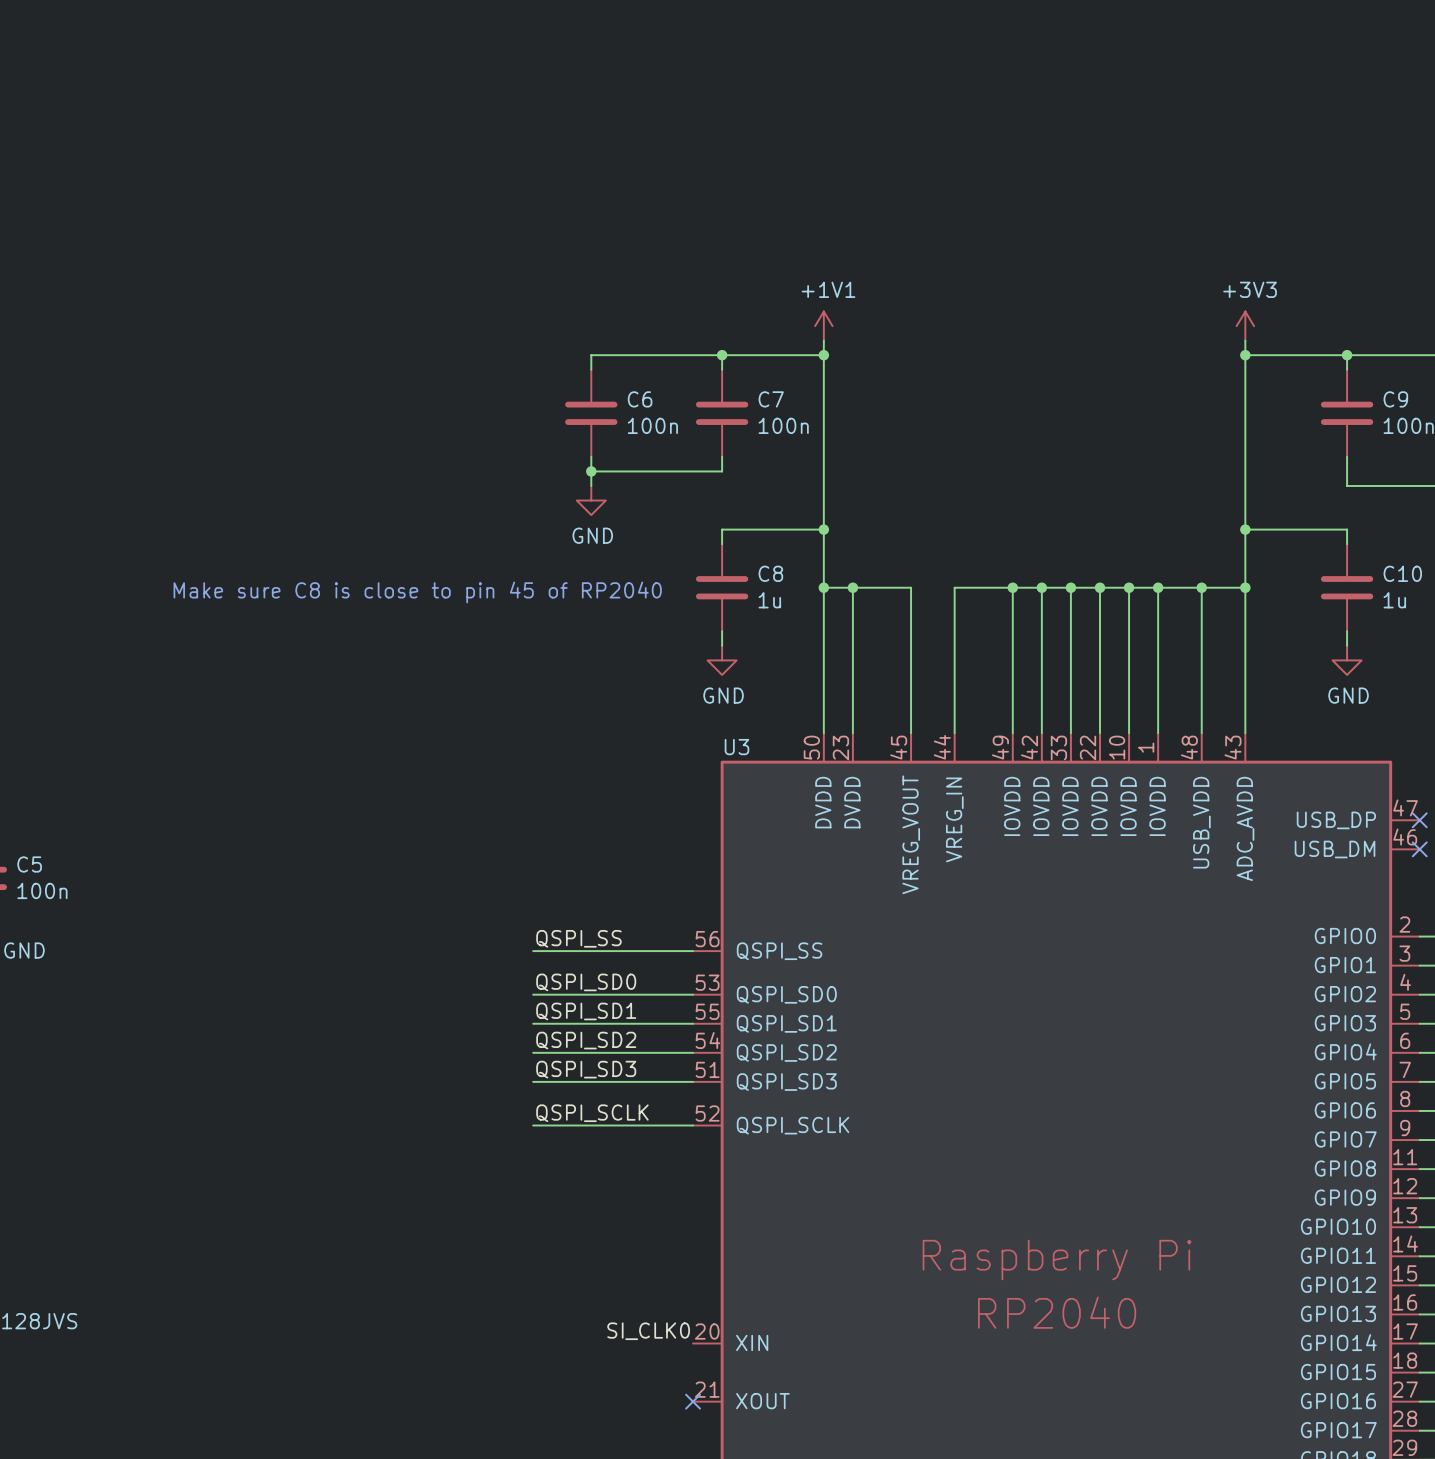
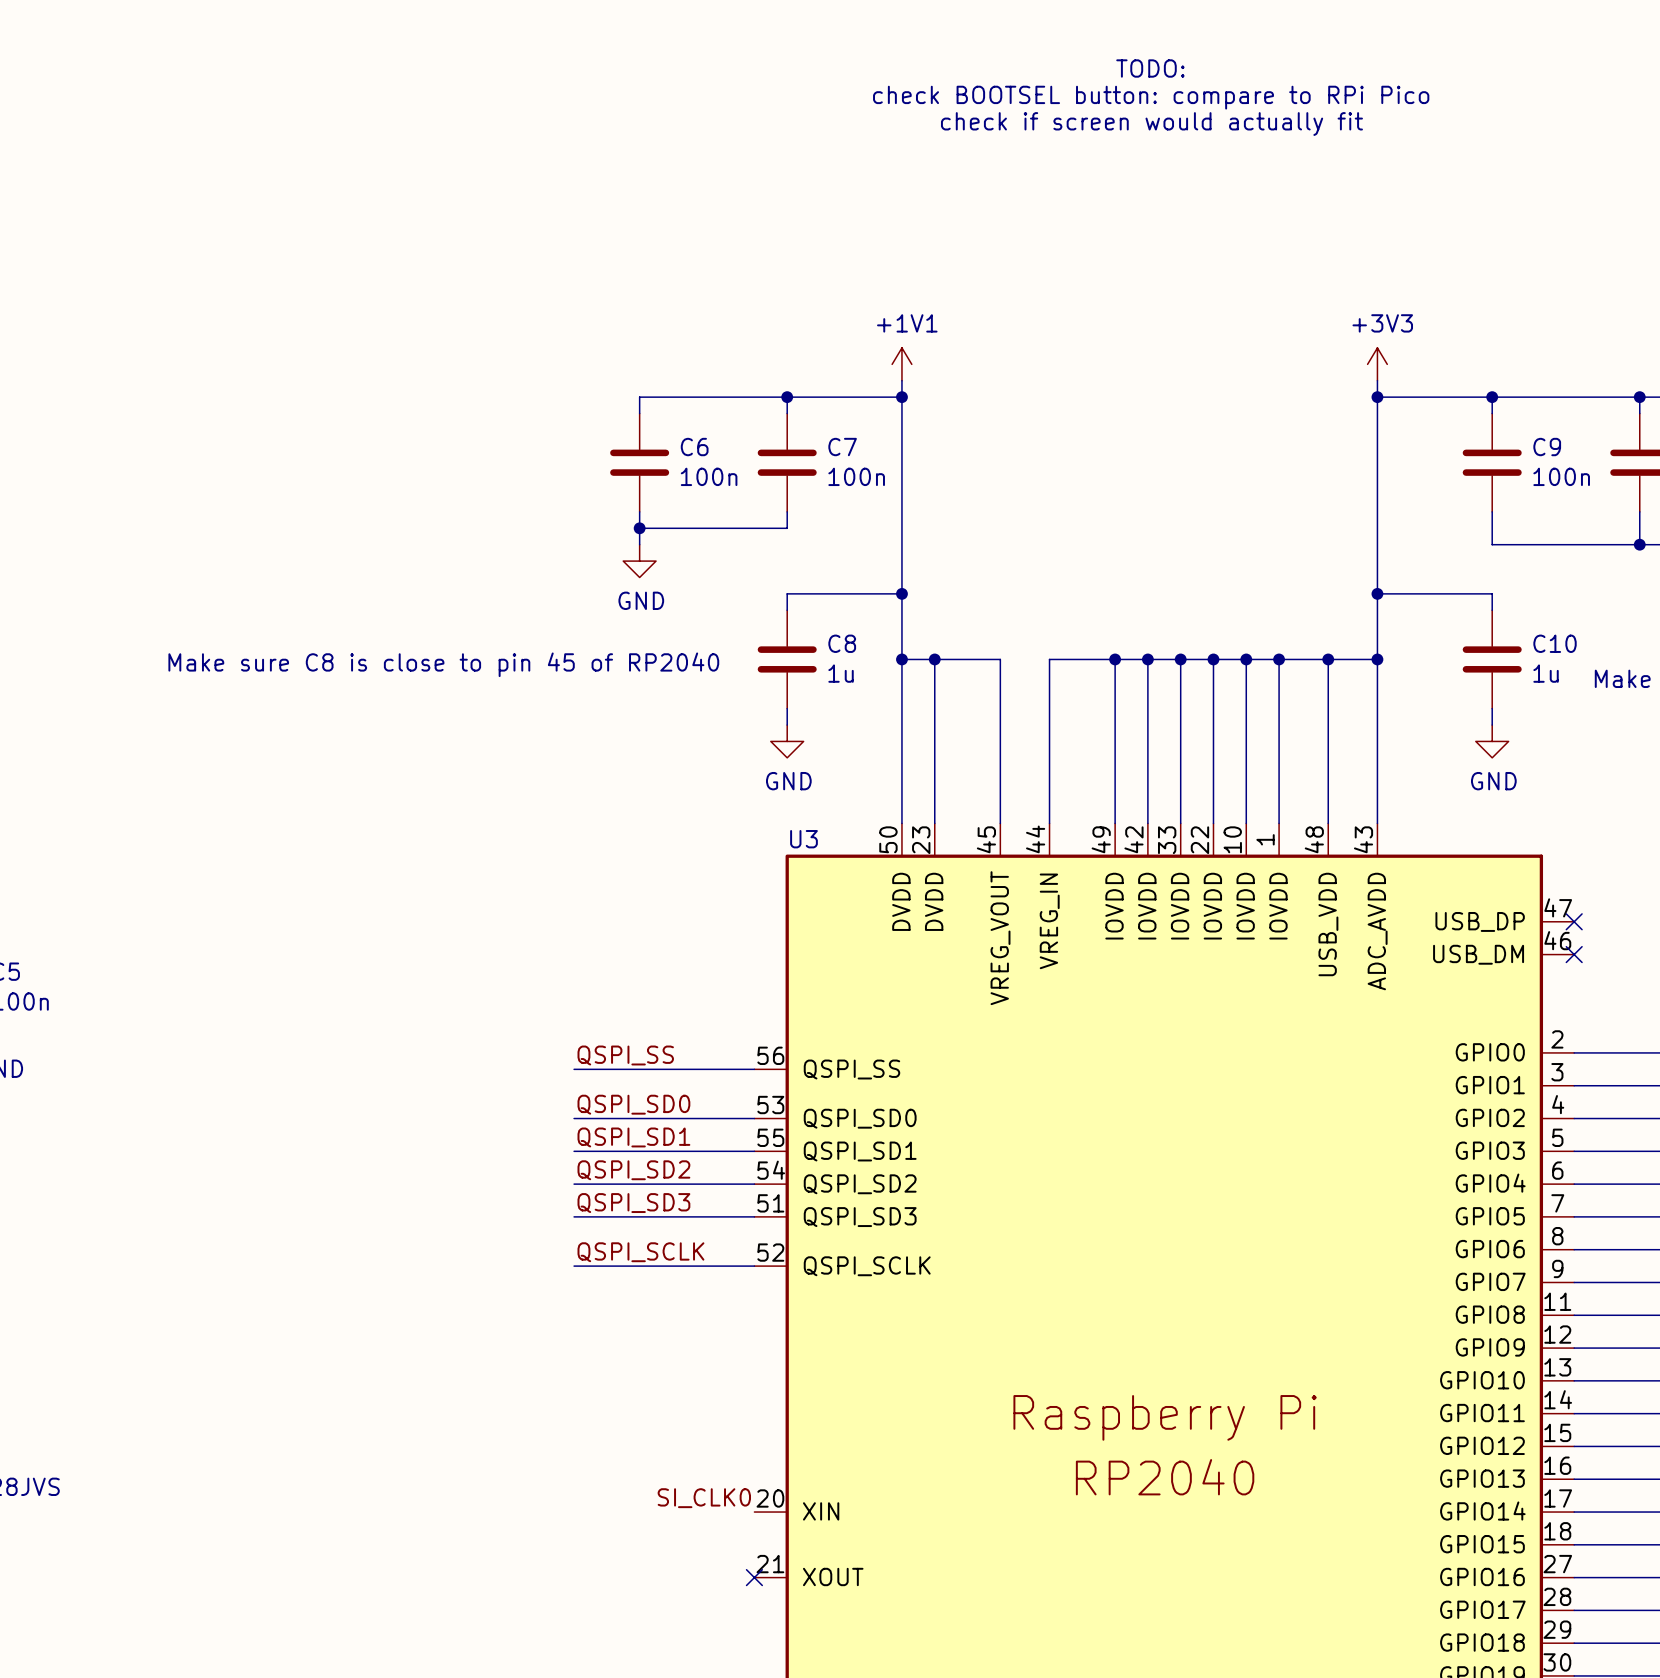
text: none -> TODO: (1150, 68)
text: none -> check BOOTSEL button: compare to RPi Pico (1151, 97)
text: none -> check if screen would actually fit (1151, 124)

